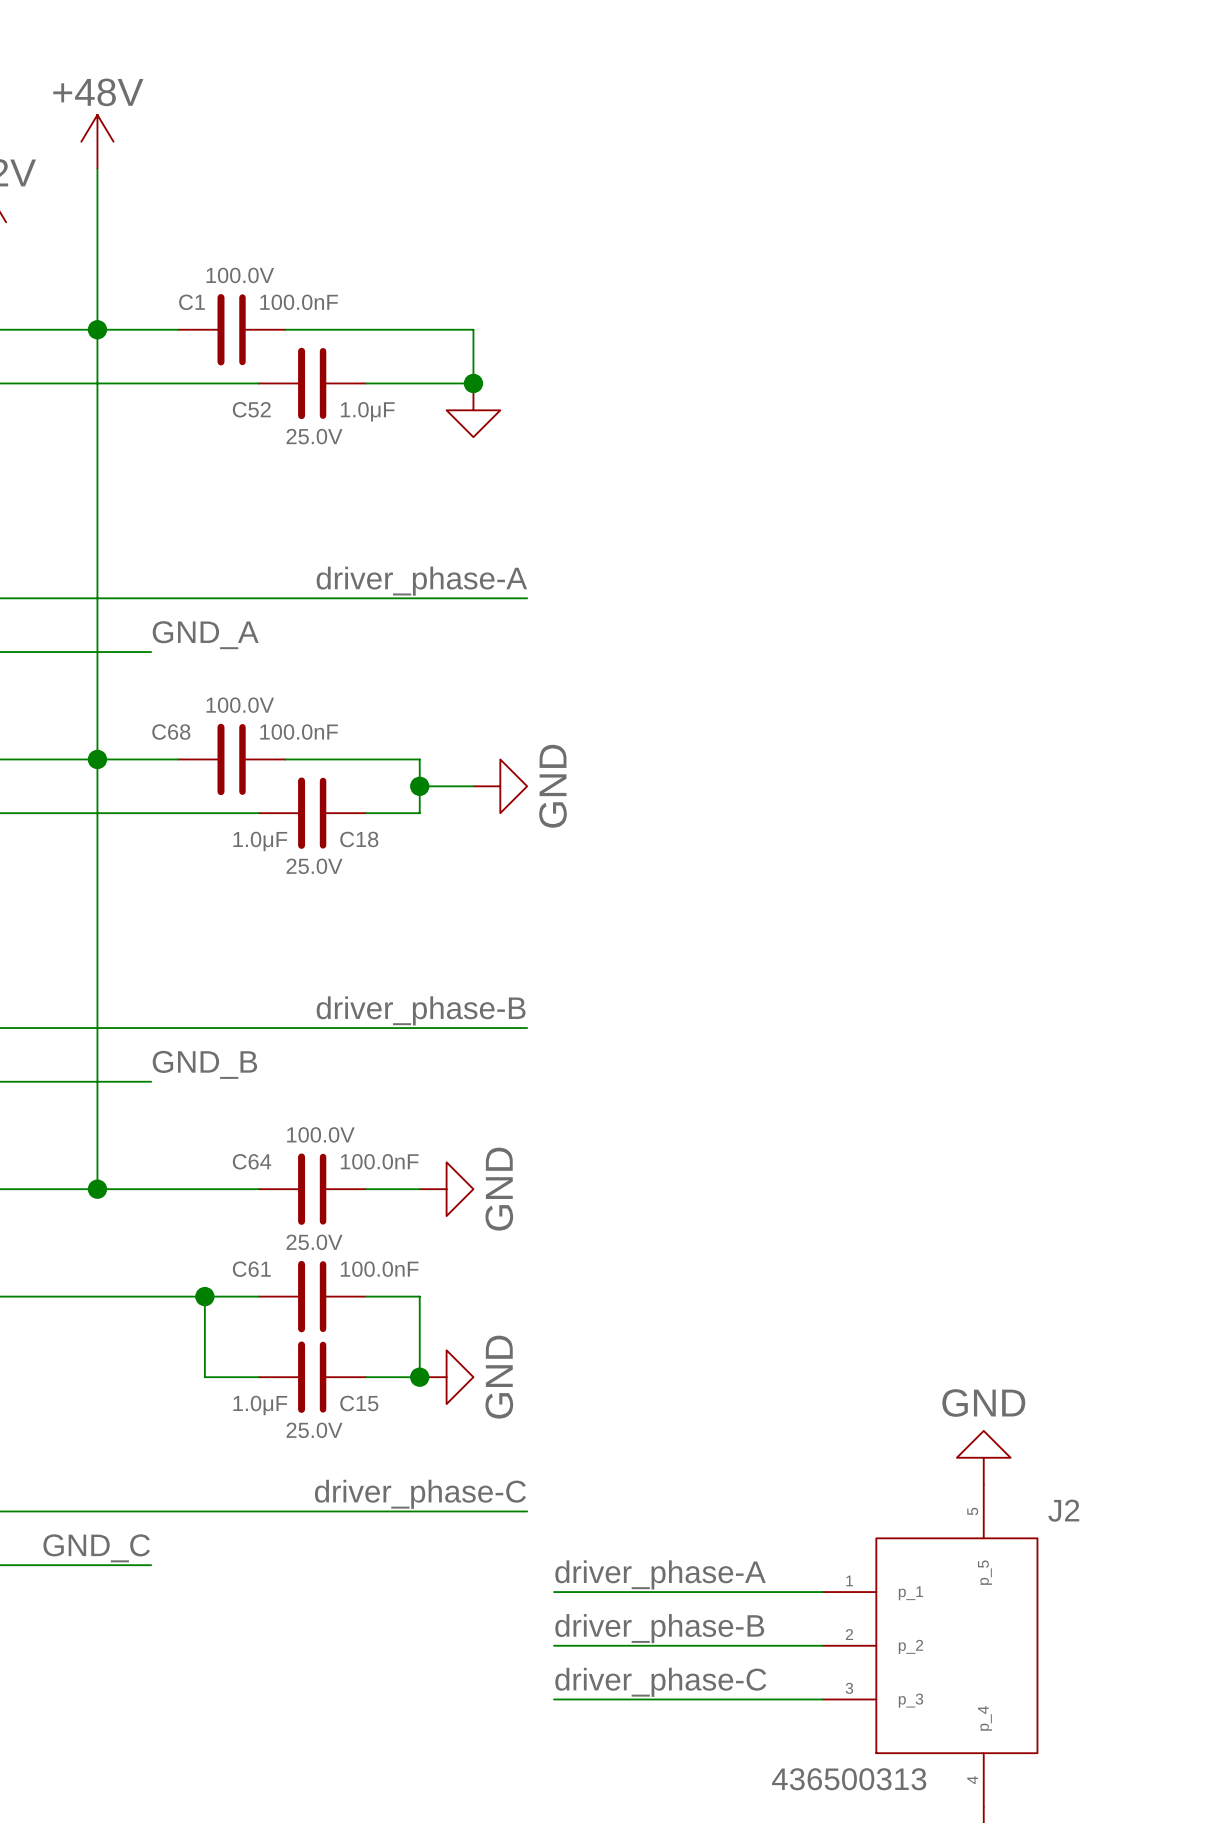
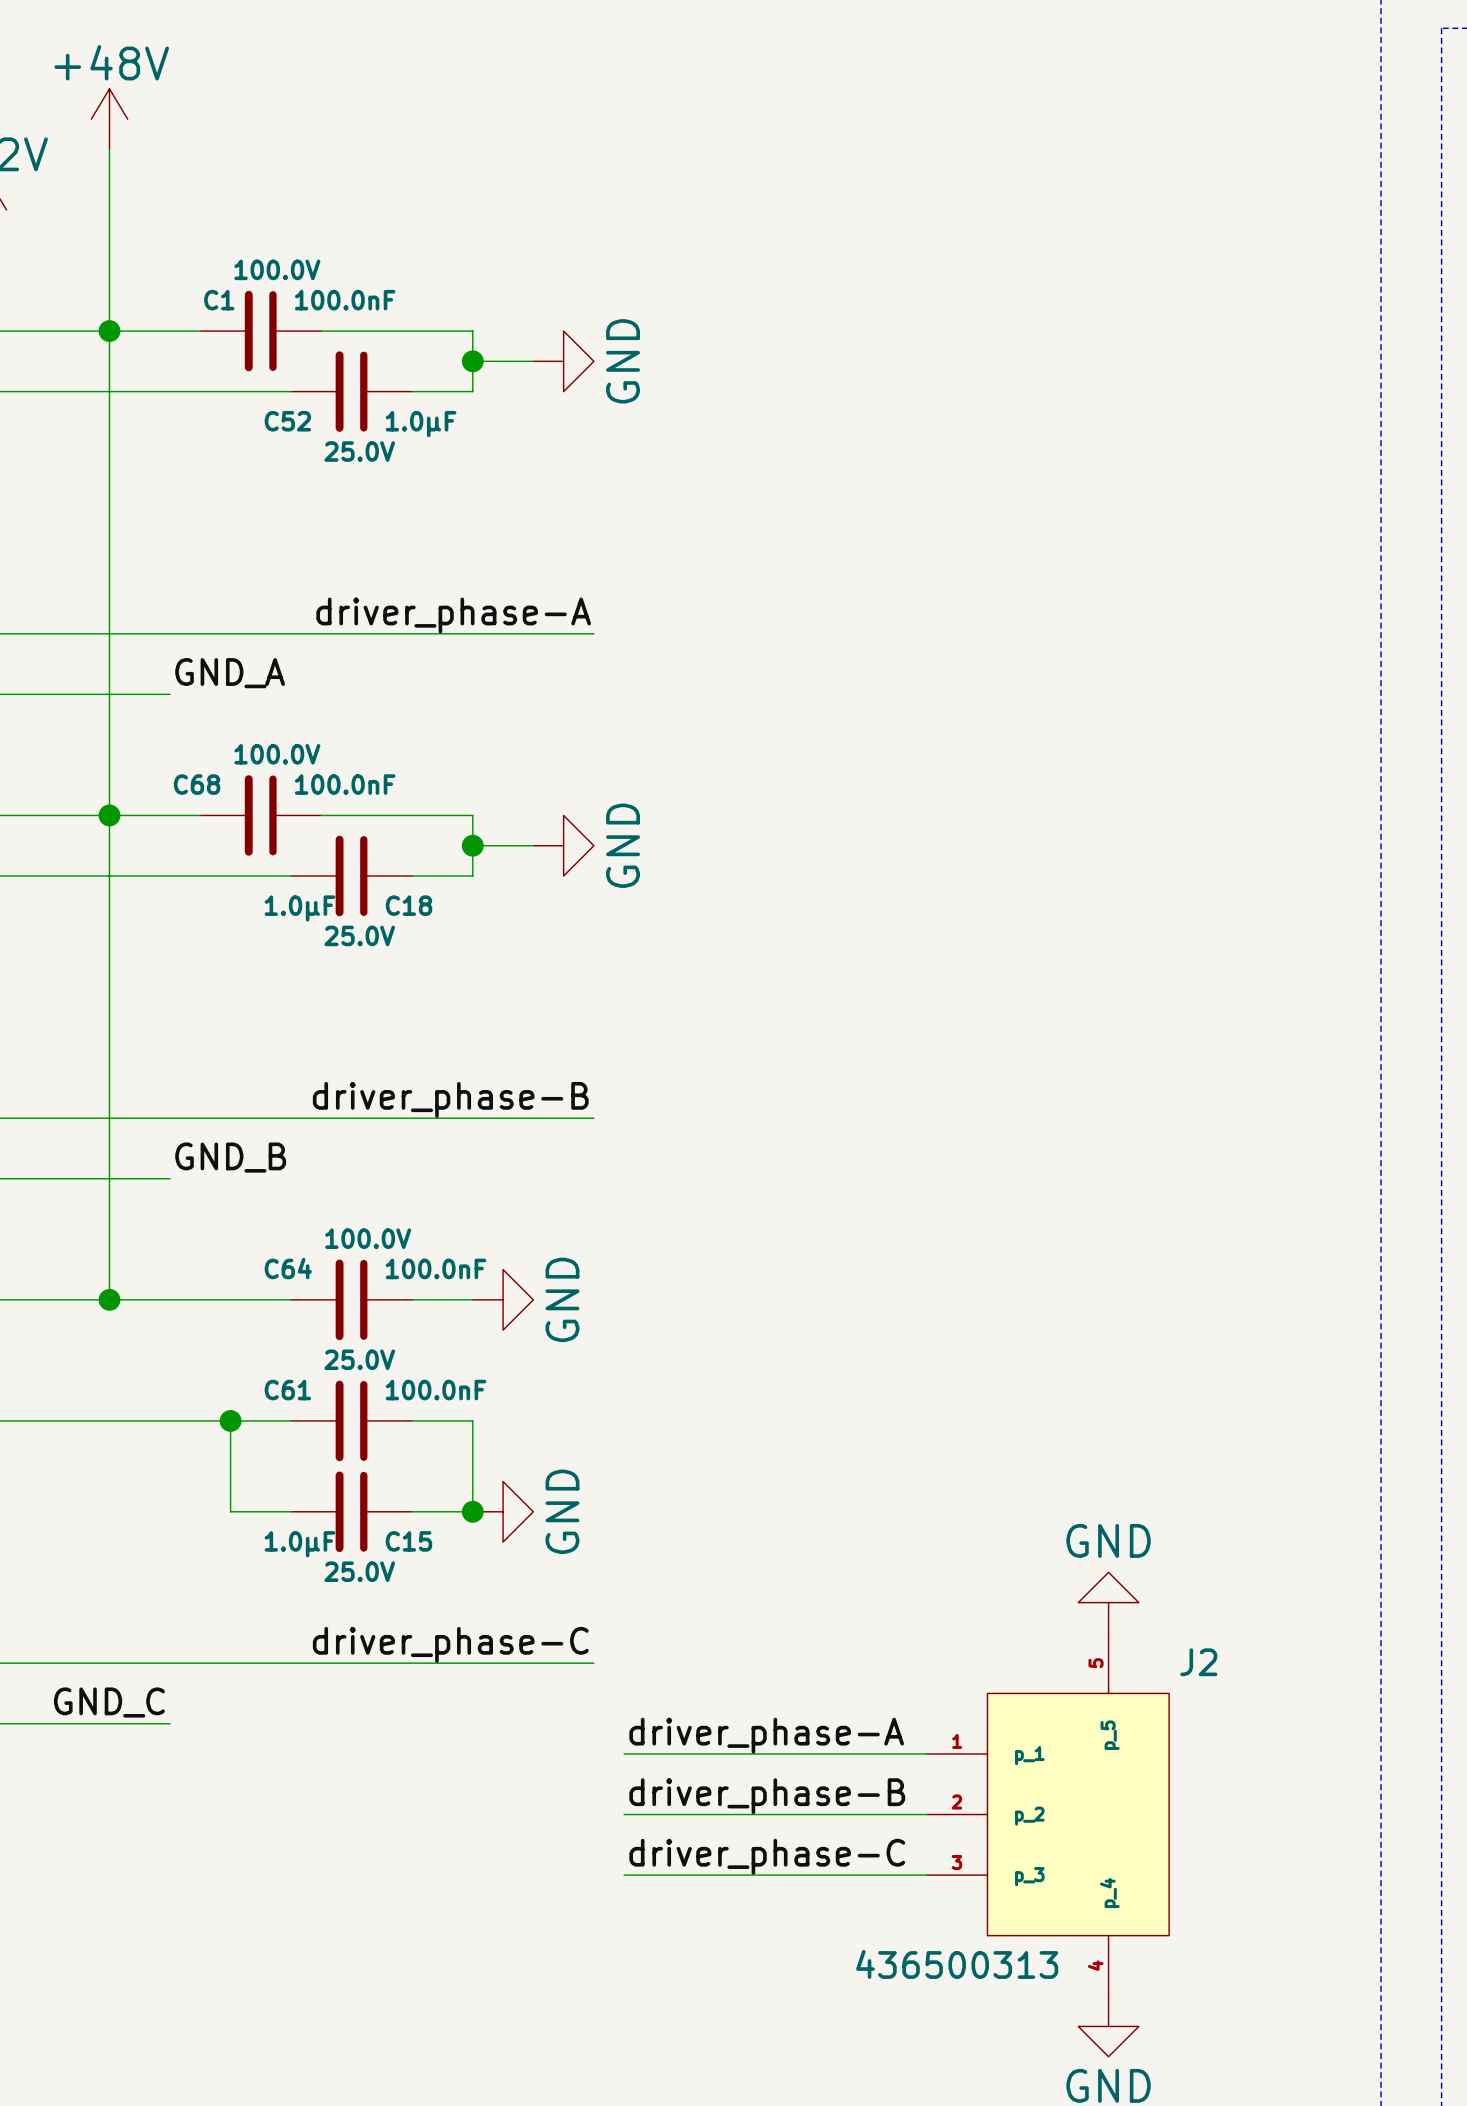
wire: (419, 329) (473, 329) (473, 383) (419, 383) -> (472, 331) (472, 391)
wire: none -> (472, 361) (533, 361)
power symbol: none -> GND (563, 361)
junction position: (473, 383) -> (472, 361)
power symbol: (473, 410) -> none

